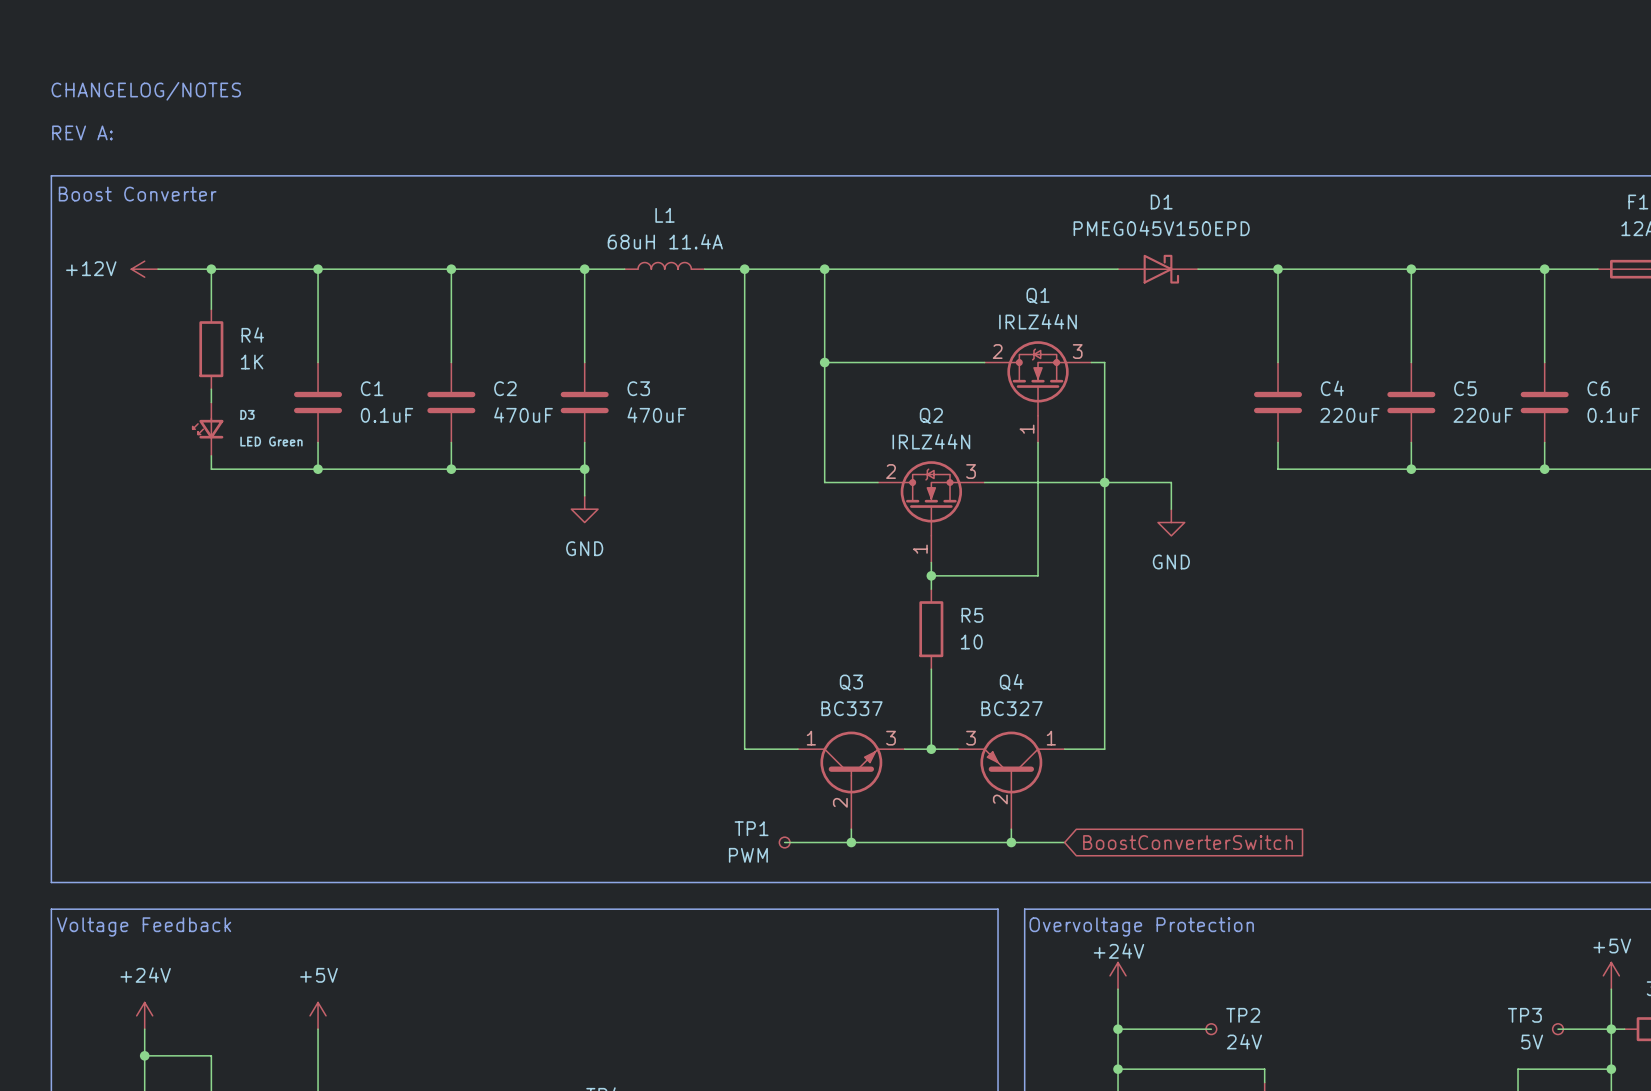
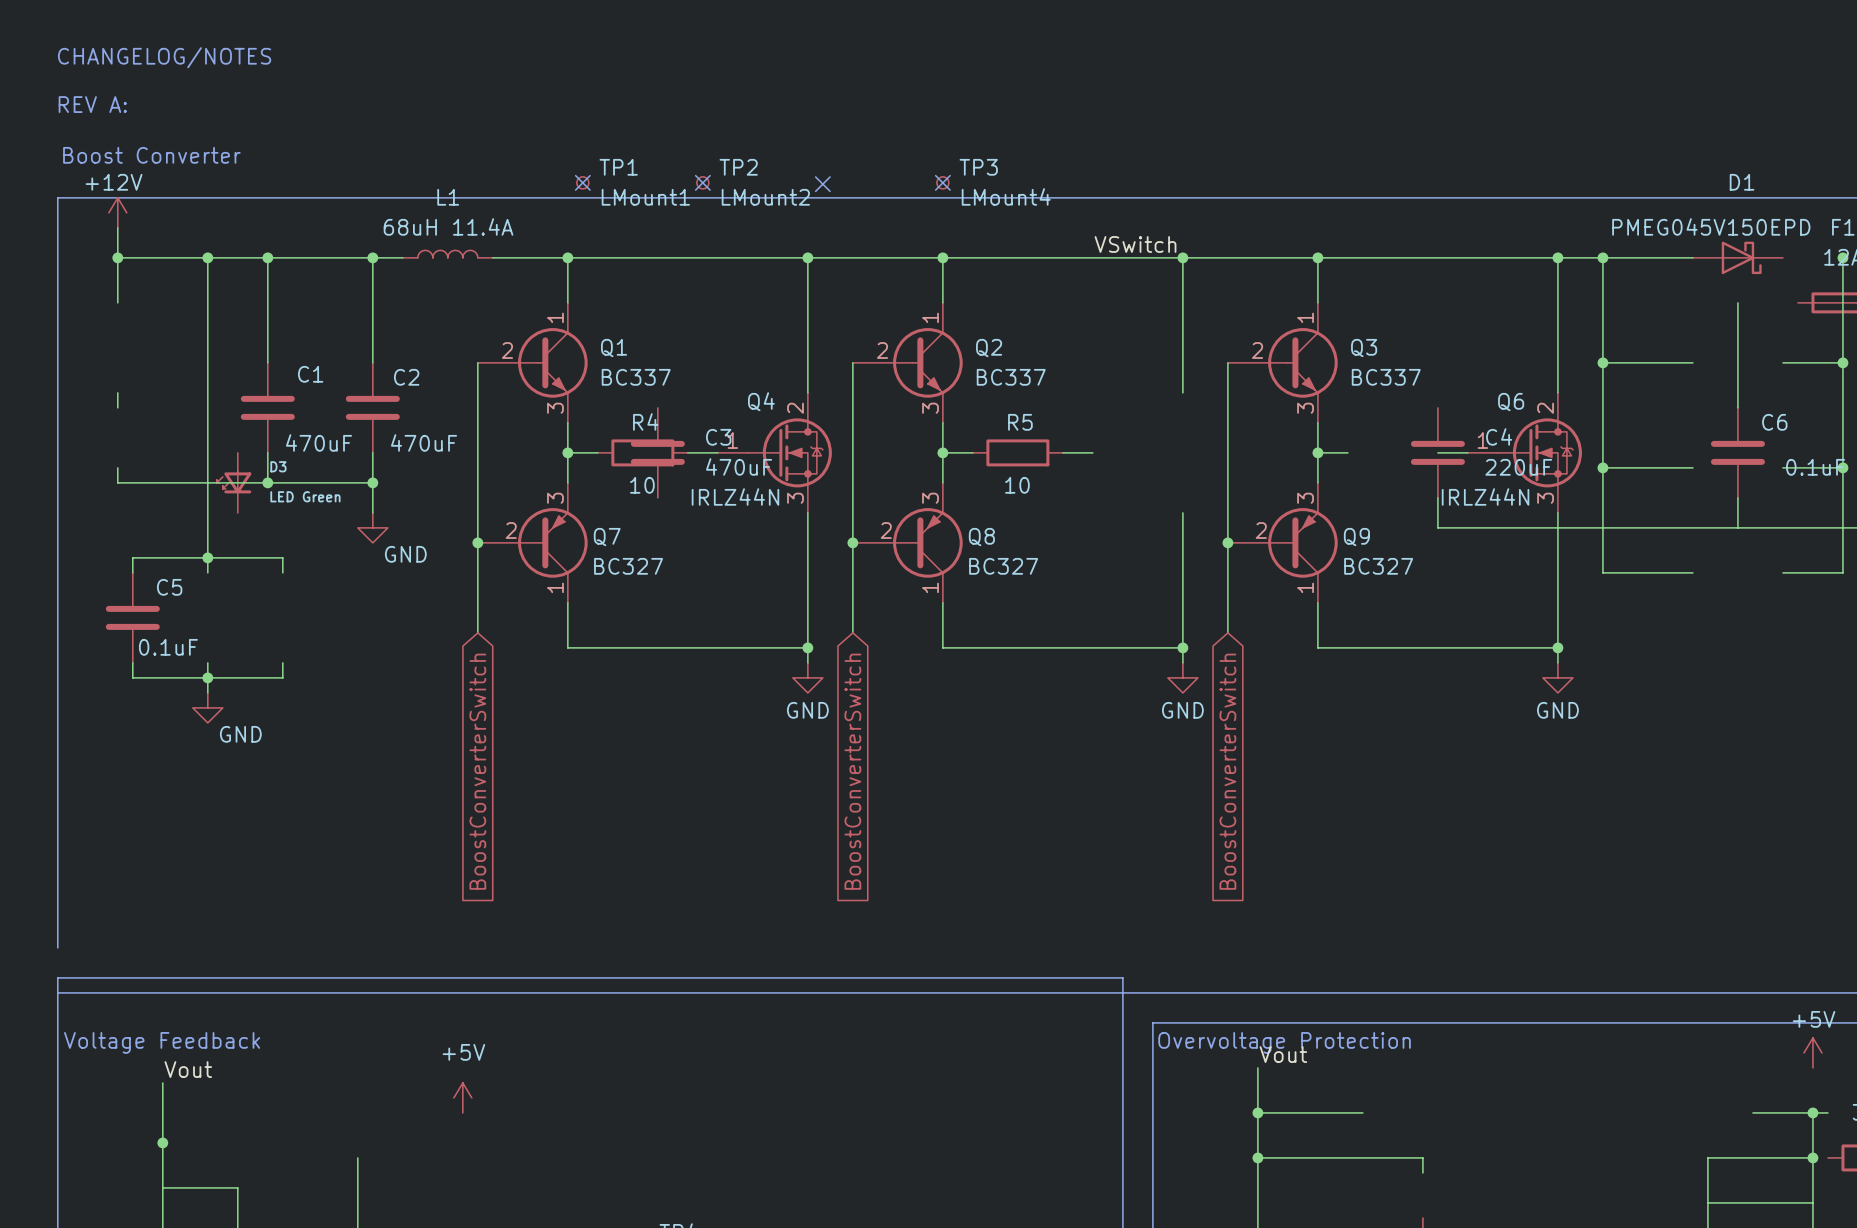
text position: CHANGELOG/NOTES (146, 91) -> CHANGELOG/NOTES (164, 57)
text position: REV A: (82, 132) -> REV A: (92, 104)
no-connect mark: none -> (582, 182)
no-connect mark: none -> (702, 182)
no-connect mark: none -> (942, 182)
no-connect mark: none -> (822, 184)
text position: Boost Converter (137, 194) -> Boost Converter (151, 155)
wire: none -> (117, 227) (117, 302)
label: none -> VSwitch (1135, 244)
D1 value position: PMEG045V150EPD (1161, 228) -> PMEG045V150EPD (1711, 226)
wire: none -> (117, 257) (402, 257)
junction: none -> (117, 257)
wire: none -> (207, 257) (207, 572)
junction: none -> (207, 257)
junction: none -> (267, 257)
wire: none -> (492, 257) (1692, 257)
wire: none -> (567, 257) (567, 302)
junction: none -> (567, 257)
wire: none -> (807, 257) (807, 392)
wire: none -> (942, 257) (942, 302)
wire: none -> (1182, 257) (1182, 392)
junction: none -> (1182, 257)
wire: none -> (1317, 257) (1317, 302)
junction: none -> (1317, 257)
wire: none -> (1557, 257) (1557, 392)
junction: none -> (1557, 257)
wire: none -> (1602, 257) (1602, 572) (1692, 572)
junction: none -> (1602, 257)
wire: none -> (1842, 257) (1842, 572) (1782, 572)
junction: none -> (1842, 257)
L1 position: (664, 265) -> (447, 254)
power symbol text position: +12V (91, 268) -> +12V (114, 182)
power symbol rotation: 0° (144, 269) -> 90° clockwise (117, 212)
power symbol position: +12V (144, 269) -> +12V (117, 212)
wire: (158, 269) (624, 269) -> none
wire: (211, 269) (211, 309) -> none
junction: (211, 269) -> none
wire: (318, 269) (318, 362) -> (267, 257) (267, 362)
junction position: (318, 269) -> (372, 257)
wire: (451, 269) (451, 362) -> none
junction: (451, 269) -> none
wire: (584, 269) (584, 362) -> (372, 257) (372, 362)
junction: (584, 269) -> none
wire: (704, 269) (1118, 269) -> none
wire: (744, 269) (744, 749) (798, 749) -> none
junction position: (744, 269) -> (807, 257)
wire: (824, 269) (824, 482) (878, 482) -> none
junction position: (824, 269) -> (942, 257)
D1 position: (1158, 269) -> (1737, 257)
wire: (1198, 269) (1598, 269) -> none
wire: (1278, 269) (1278, 362) -> none
junction: (1278, 269) -> none
wire: (1411, 269) (1411, 362) -> none
junction: (1411, 269) -> none
junction: (1544, 269) -> none
Q1 name position: Q1 (1038, 295) -> Q1 (614, 348)
Q1 value: IRLZ44N (1038, 321) -> BC337 (636, 377)
wire: none -> (477, 362) (477, 632)
wire: none -> (852, 362) (852, 632)
wire: none -> (1227, 362) (1227, 632)
wire: none -> (1602, 362) (1692, 362)
junction: none -> (1602, 362)
wire: none -> (1782, 362) (1842, 362)
junction: none -> (1842, 362)
R4 name position: R4 (252, 335) -> R4 (645, 421)
Q1 symbol: [984, 341, 1092, 443] -> [477, 302, 588, 423]
R4 rotation: 0° (211, 349) -> 90° clockwise (642, 452)
R4 position: (211, 349) -> (642, 452)
R4 value: 1K (252, 362) -> 10 (642, 485)
wire: (824, 362) (984, 362) -> none
junction position: (824, 362) -> (942, 452)
wire: (1091, 362) (1104, 362) (1104, 749) (1064, 749) -> none
wire: none -> (567, 422) (567, 482)
wire: none -> (942, 422) (942, 482)
wire: none -> (1317, 422) (1317, 482)
C1 name position: C1 (372, 388) -> C1 (310, 374)
C2 name position: C2 (505, 388) -> C2 (406, 377)
C5 name position: C5 (1465, 388) -> C5 (169, 587)
C6 name position: C6 (1598, 388) -> C6 (1774, 422)
wire: (211, 389) (211, 402) -> (117, 392) (117, 407)
C1 position: (318, 402) -> (267, 407)
C2 position: (451, 402) -> (372, 407)
wire: none -> (567, 452) (597, 452)
junction: none -> (567, 452)
wire: none -> (687, 452) (717, 452)
wire: none -> (942, 452) (972, 452)
wire: none -> (1062, 452) (1092, 452)
wire: none -> (1317, 452) (1347, 452)
junction: none -> (1317, 452)
wire: none -> (1437, 452) (1467, 452)
Q6: none -> IRLZ44N (1524, 452)
C5 position: (1411, 402) -> (132, 617)
wire: none -> (117, 467) (117, 482) (372, 482)
C1 value: 0.1uF (387, 415) -> 470uF (319, 442)
C2 value position: 470uF (523, 415) -> 470uF (424, 442)
Q2 name position: Q2 (931, 415) -> Q2 (989, 348)
wire: none -> (1602, 467) (1692, 467)
junction: none -> (1602, 467)
C5 value: 220uF (1483, 415) -> 0.1uF (168, 647)
wire: none -> (1782, 467) (1842, 467)
junction: none -> (1842, 467)
junction: none -> (267, 482)
Q2 value: IRLZ44N (931, 441) -> BC337 (1011, 377)
wire: (318, 442) (318, 469) -> (267, 452) (267, 482)
wire: (451, 442) (451, 469) -> none
wire: (584, 442) (584, 495) -> (372, 452) (372, 512)
wire: (1038, 442) (1038, 575) -> (1182, 647) (1167, 647)
wire: (1411, 442) (1411, 469) -> none
wire: (211, 455) (211, 469) (584, 469) -> none
wire: none -> (807, 512) (807, 662)
wire: none -> (1182, 512) (1182, 662)
wire: none -> (1557, 512) (1557, 662)
Q2 symbol: [878, 461, 985, 563] -> [852, 302, 963, 423]
junction position: (318, 469) -> (372, 482)
power symbol: none -> GND (372, 527)
junction position: (451, 469) -> (477, 542)
junction: (584, 469) -> none
junction: (1411, 469) -> none
junction: (1544, 469) -> none
Q7: none -> BC327 (532, 542)
junction: none -> (852, 542)
Q8: none -> BC327 (907, 542)
wire: (984, 482) (1171, 482) (1171, 509) -> none
junction position: (1104, 482) -> (1227, 542)
Q9: none -> BC327 (1282, 542)
junction: none -> (207, 557)
wire: none -> (132, 572) (132, 557) (282, 557) (282, 572)
power symbol: GND (584, 509) -> none
power symbol: GND (1171, 522) -> none
wire: none -> (567, 602) (567, 647) (807, 647)
wire: none -> (942, 602) (942, 647) (1047, 647)
wire: none -> (1317, 602) (1317, 647) (1557, 647)
wire: (931, 562) (931, 589) -> none
junction: none -> (807, 647)
junction: (931, 575) -> none
junction: none -> (1182, 647)
junction: none -> (1557, 647)
wire: none -> (132, 662) (132, 677) (282, 677) (282, 662)
wire: none -> (207, 662) (207, 692)
junction: none -> (207, 677)
power symbol: none -> GND (807, 677)
power symbol: none -> GND (1182, 677)
power symbol: none -> GND (1557, 677)
R5 name position: R5 (972, 615) -> R5 (1020, 422)
power symbol: none -> GND (207, 707)
R5 rotation: 0° (931, 629) -> 90° clockwise (1017, 452)
R5 position: (931, 629) -> (1017, 452)
wire: (931, 669) (931, 749) -> none
Q3 name position: Q3 (851, 682) -> Q3 (1364, 348)
Q4 name position: Q4 (1011, 682) -> Q4 (761, 401)
global label: none -> BoostConverterSwitch (477, 771)
global label: none -> BoostConverterSwitch (852, 771)
global label: none -> BoostConverterSwitch (1227, 771)
Q3 value position: BC337 (851, 708) -> BC337 (1386, 377)
Q4 value: BC327 (1011, 708) -> IRLZ44N (735, 496)
Q4 symbol: [958, 731, 1065, 830] -> [717, 392, 832, 513]
wire: (904, 749) (958, 749) -> none
junction: (931, 749) -> none
Q3 rotation: 0° (851, 762) -> 90° clockwise (1302, 362)
Q3 position: (851, 780) -> (1282, 362)
TP1 name position: TP1 (751, 828) -> TP1 (618, 167)
wire: (851, 829) (851, 842) -> none
wire: (1011, 829) (1011, 842) -> none
line: (51, 842) (51, 869) -> (57, 992) (57, 1022)
wire: (784, 842) (1064, 842) -> none
TP1 position: (784, 842) -> (582, 182)
junction: (851, 842) -> none
junction: (1011, 842) -> none
global label: BoostConverterSwitch (1188, 842) -> none
TP1 value: PWM (748, 855) -> LMount1 (645, 197)
line: (51, 909) (998, 909) -> (57, 977) (1122, 977) (1122, 1022)
label: none -> Vout (1283, 1054)
wire: none -> (1257, 1067) (1257, 1112) (1362, 1112)
label: none -> Vout (188, 1069)
wire: none -> (162, 1082) (162, 1157)
power symbol: +24V (1118, 975) -> none
power symbol position: +5V (1611, 975) -> +5V (1812, 1052)
junction: none -> (1257, 1112)
wire: none -> (1752, 1112) (1827, 1112)
junction: none -> (1812, 1112)
power symbol: +24V (144, 1015) -> none
power symbol position: +5V (318, 1015) -> +5V (462, 1097)
TP3 name position: TP3 (1524, 1015) -> TP3 (978, 167)
wire: none -> (1362, 1157) (1422, 1157) (1422, 1172)
TP2 position: (1211, 1029) -> (702, 182)
wire: none -> (1752, 1157) (1707, 1157) (1707, 1202)
TP3 position: (1558, 1029) -> (942, 182)
wire: (1611, 1029) (1624, 1029) -> none
TP2 value: 24V (1244, 1041) -> LMount2 (765, 197)
TP3 value: 5V (1532, 1042) -> LMount4 (1006, 196)
junction position: (144, 1055) -> (162, 1142)
wire: (1118, 1069) (1264, 1069) (1264, 1082) -> none
junction: (1118, 1069) -> none
junction: (1611, 1069) -> none

